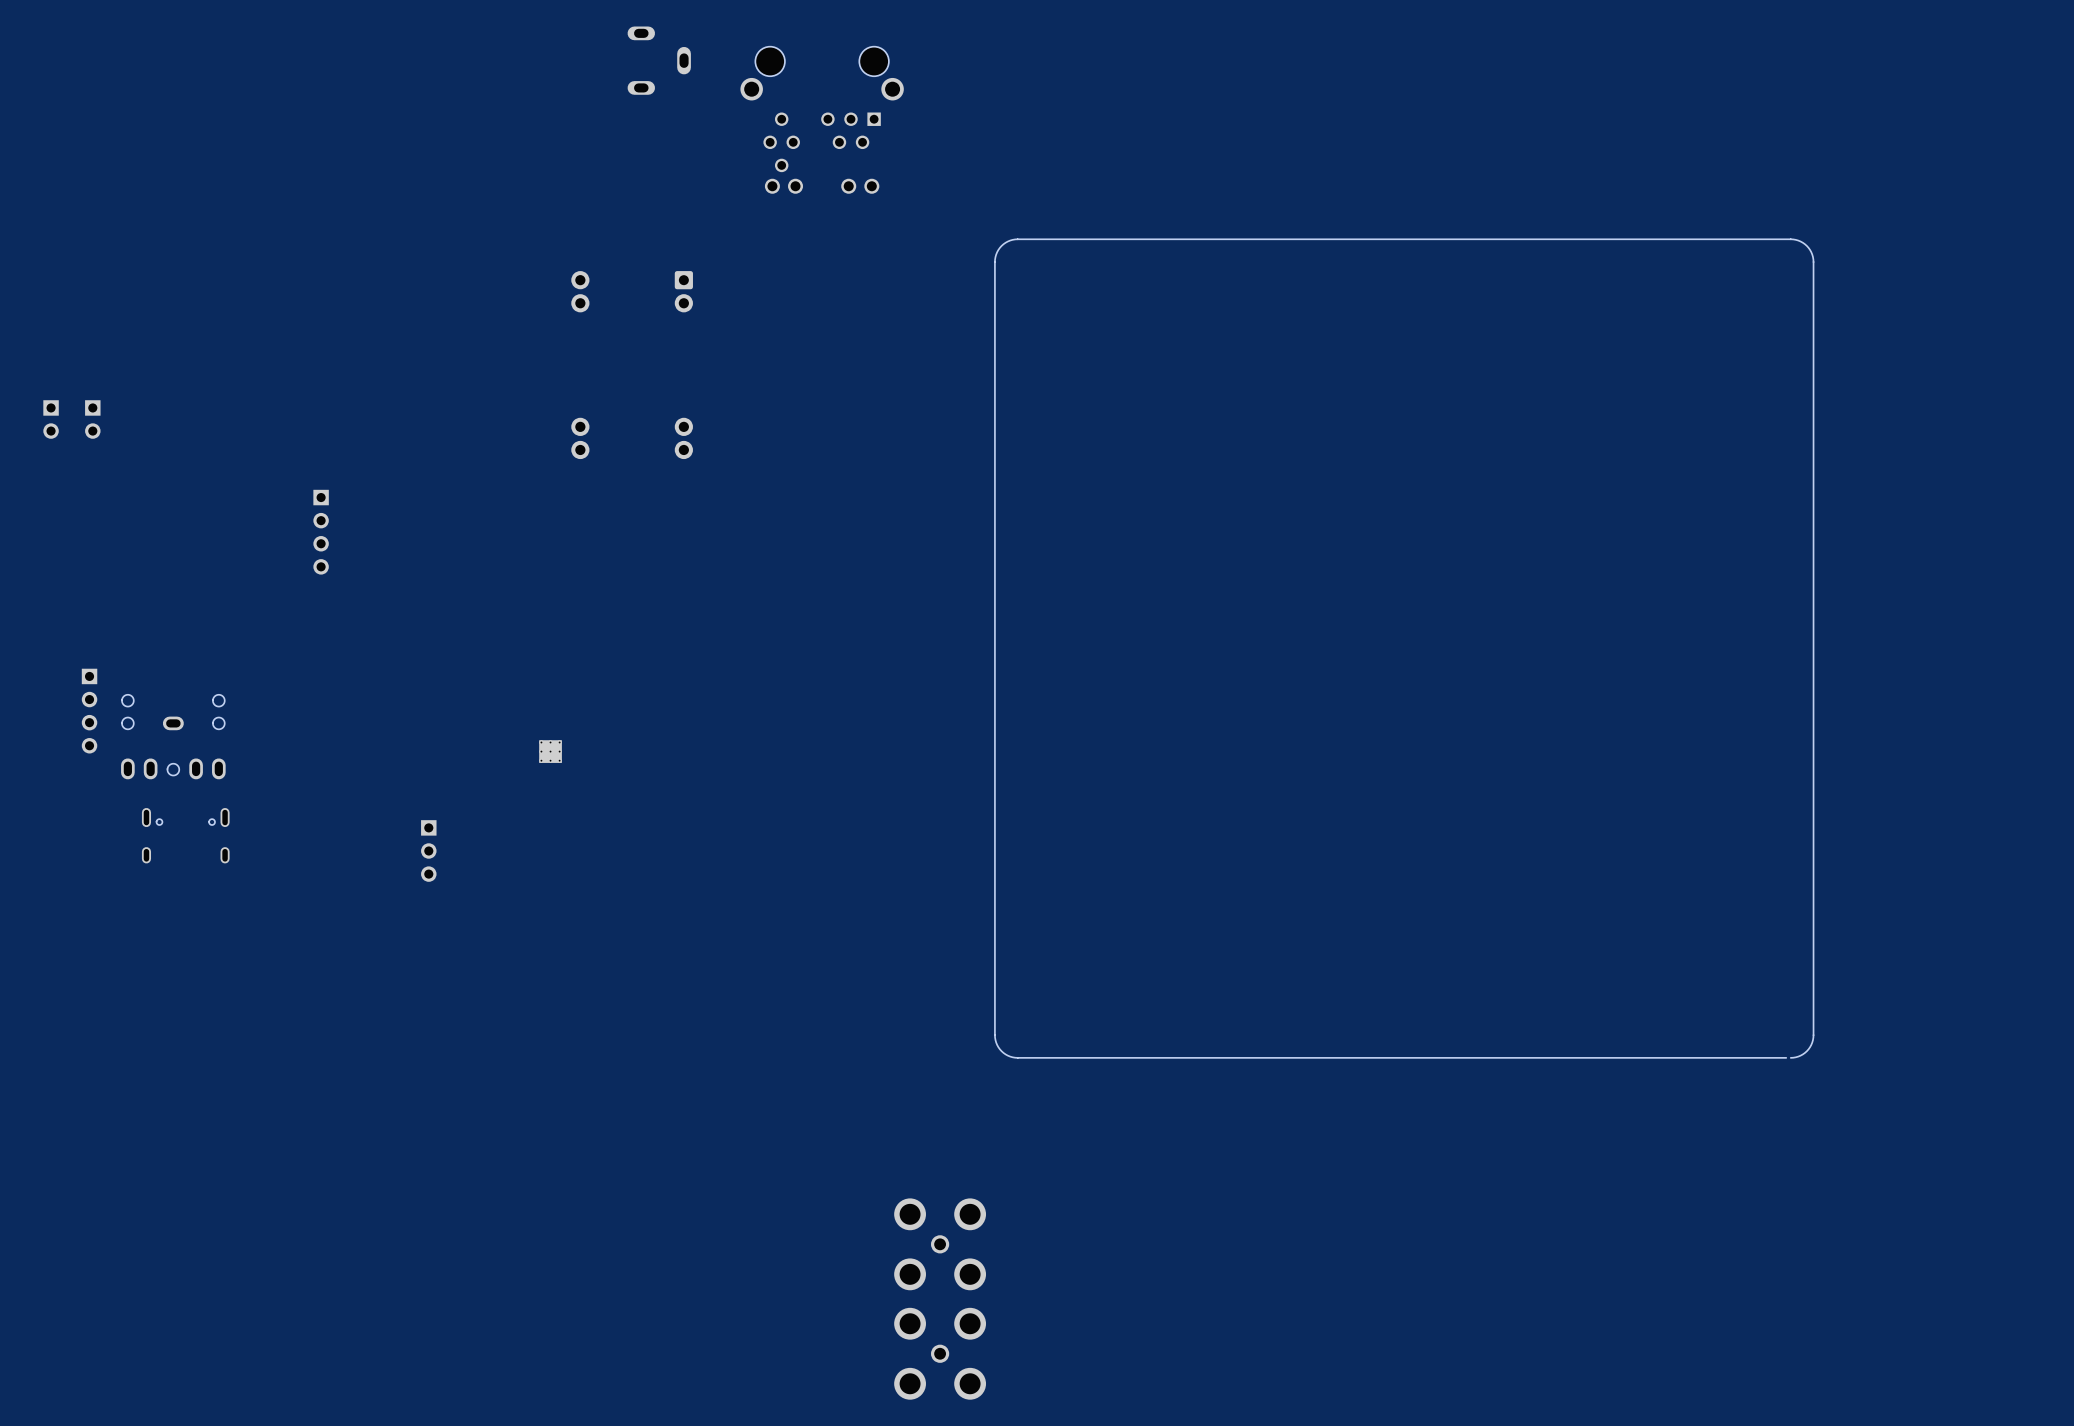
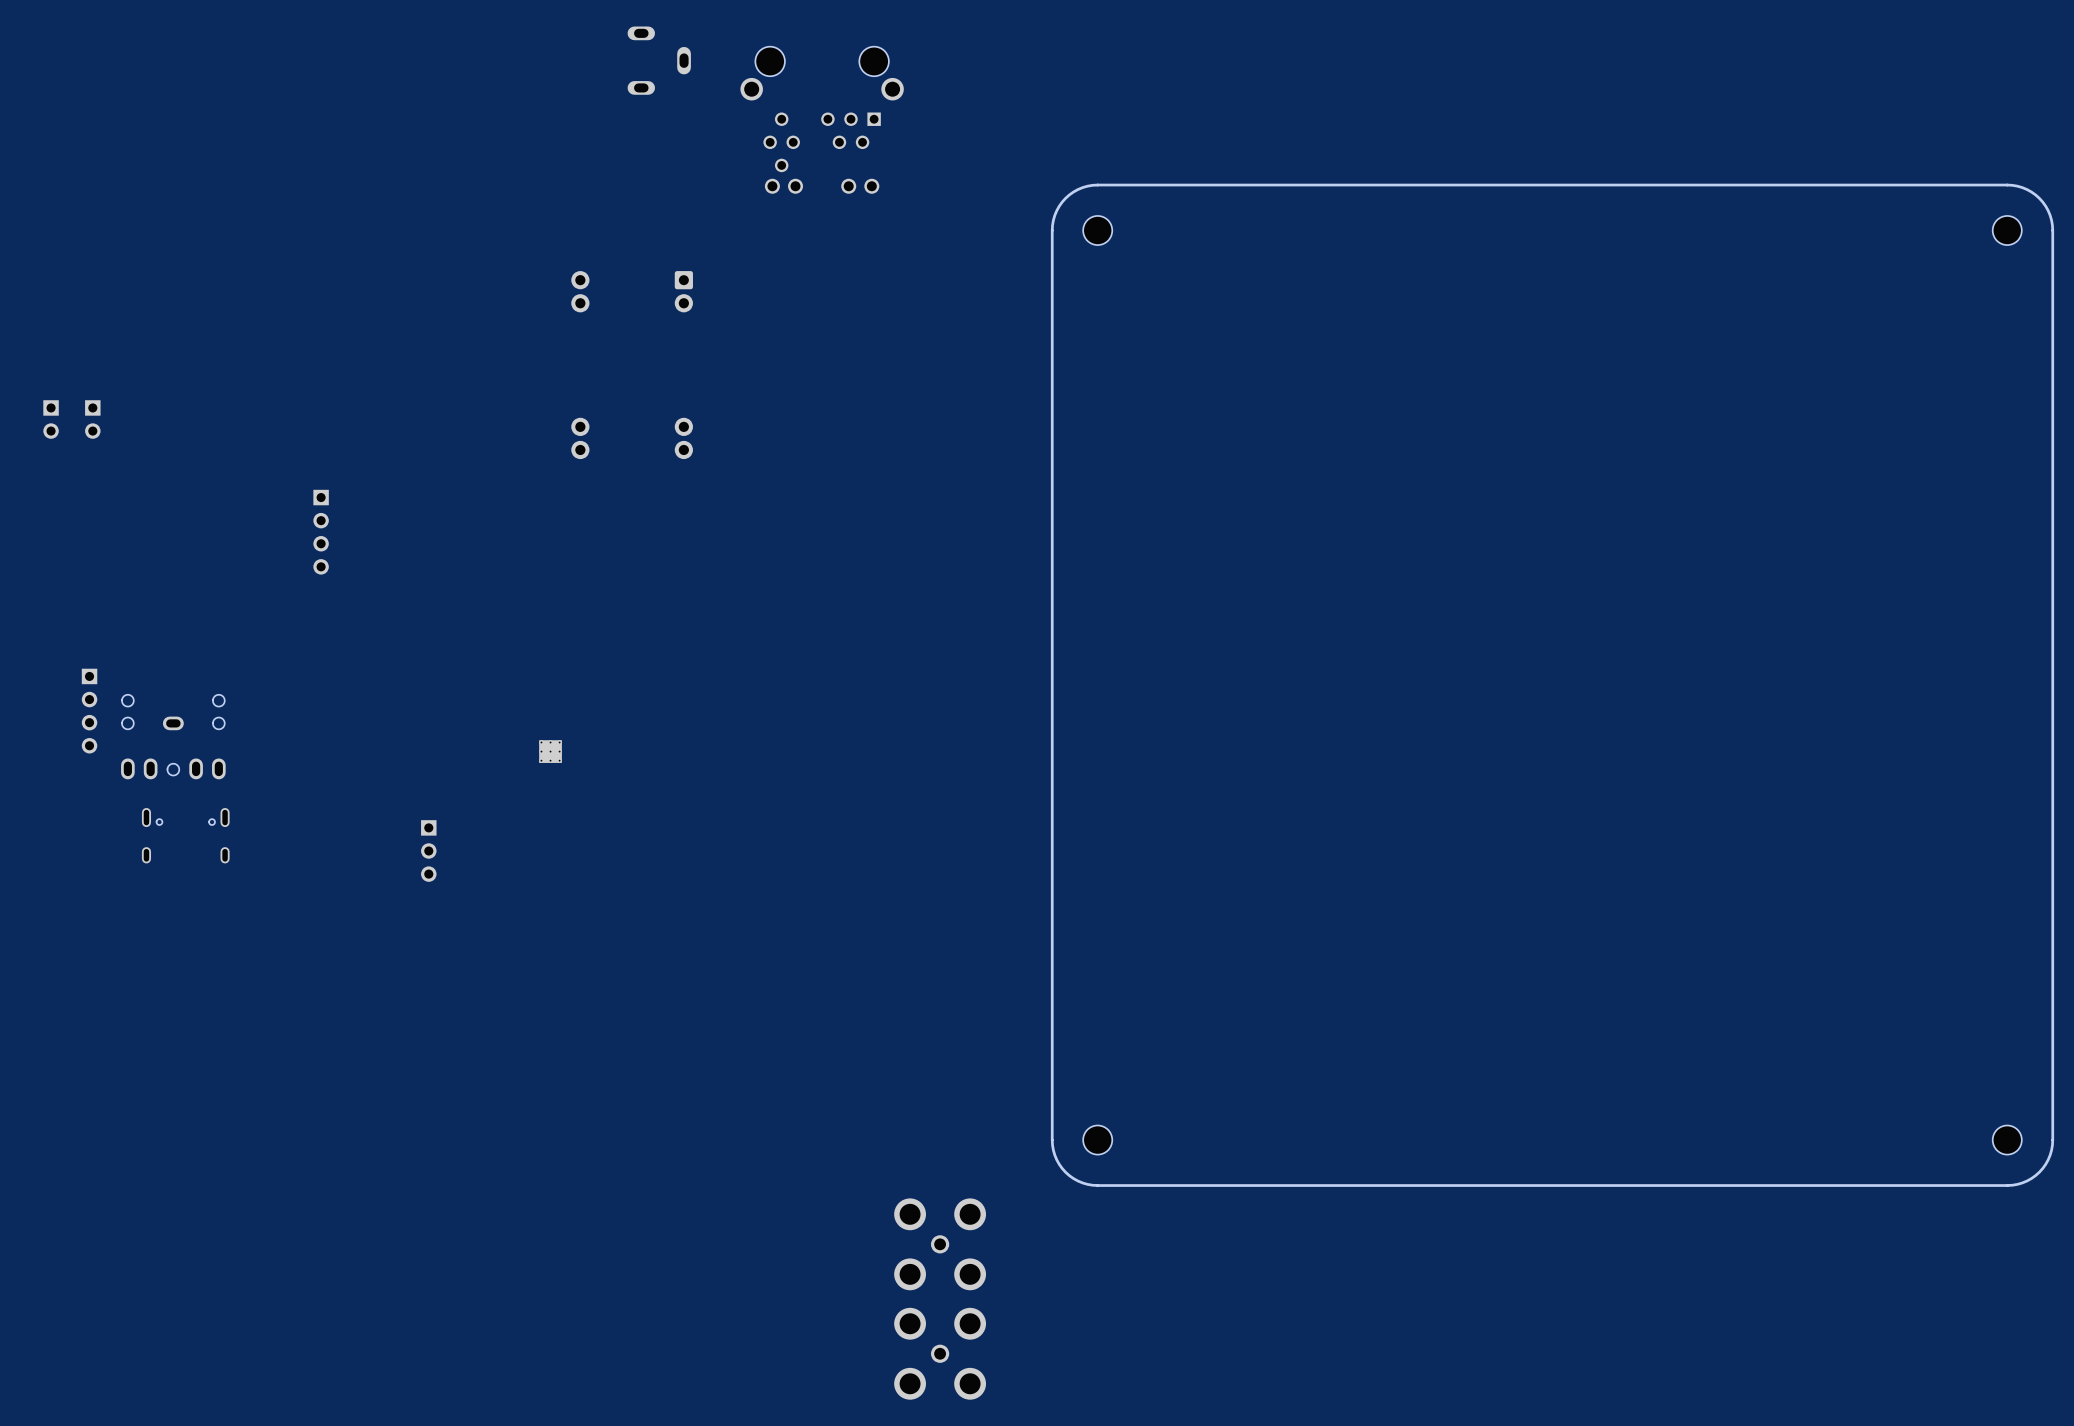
board edge: none -> (2007, 185) (1097, 185) (1082, 187) (1065, 198) (1054, 215) (1052, 230) (1052, 1140) (1054, 1155) (1065, 1172) (1082, 1182) (1097, 1185) (2007, 1185) (2022, 1182) (2039, 1172) (2050, 1155) (2052, 1140) (2052, 230) (2050, 215) (2039, 198) (2022, 187) (2007, 185)
part: none -> (1097, 230)
part: none -> (2007, 230)
board edge: (1790, 1057) (1800, 1055) (1806, 1051) (1812, 1042) (1813, 1035) (1813, 262) (1812, 254) (1806, 245) (1798, 240) (1790, 239) (1017, 239) (1007, 241) (1001, 245) (996, 254) (994, 262) (994, 1035) (996, 1042) (1001, 1051) (1007, 1055) (1017, 1057) (1786, 1057) -> none
part: none -> (1097, 1140)
part: none -> (2007, 1140)

